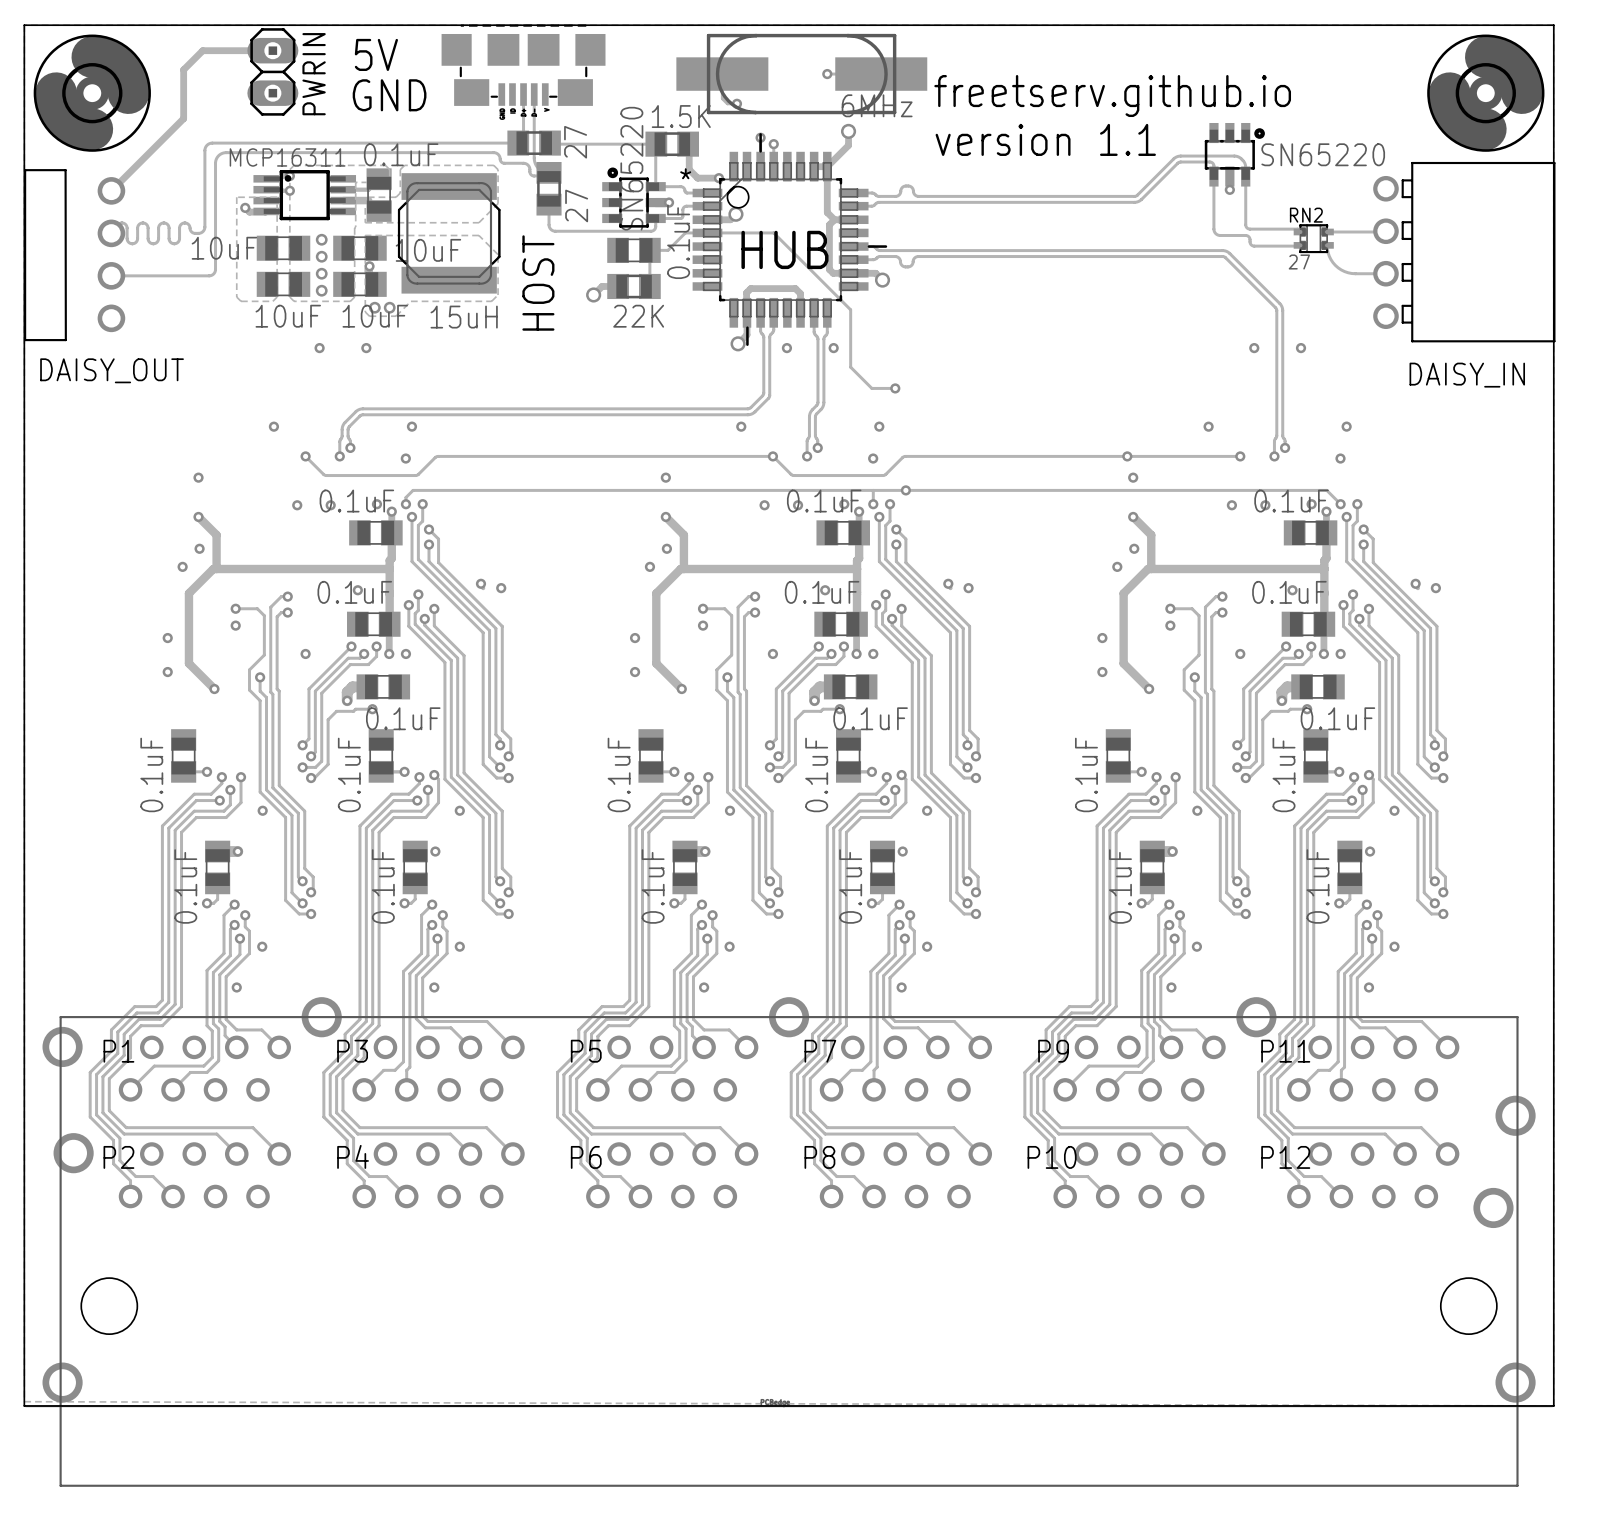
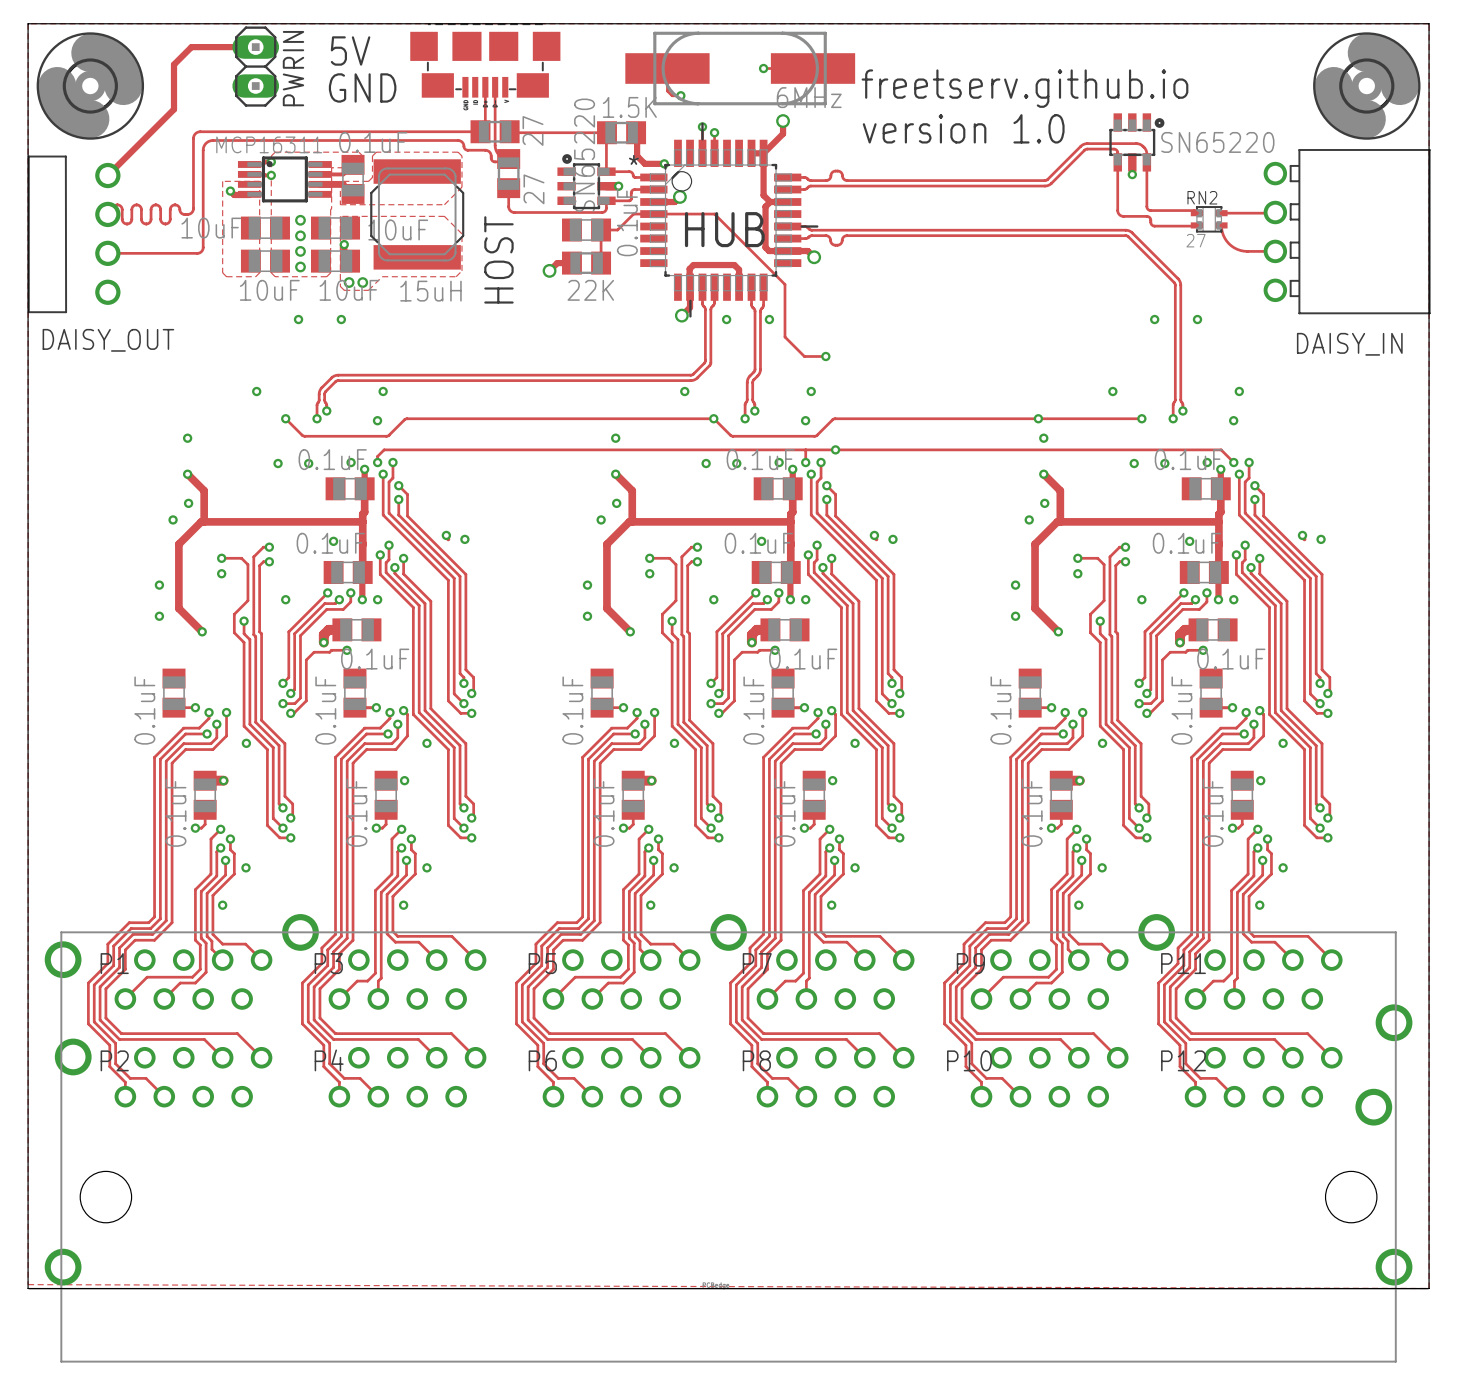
text: version 1.1 (1045, 139) -> version 1.0 (963, 128)

